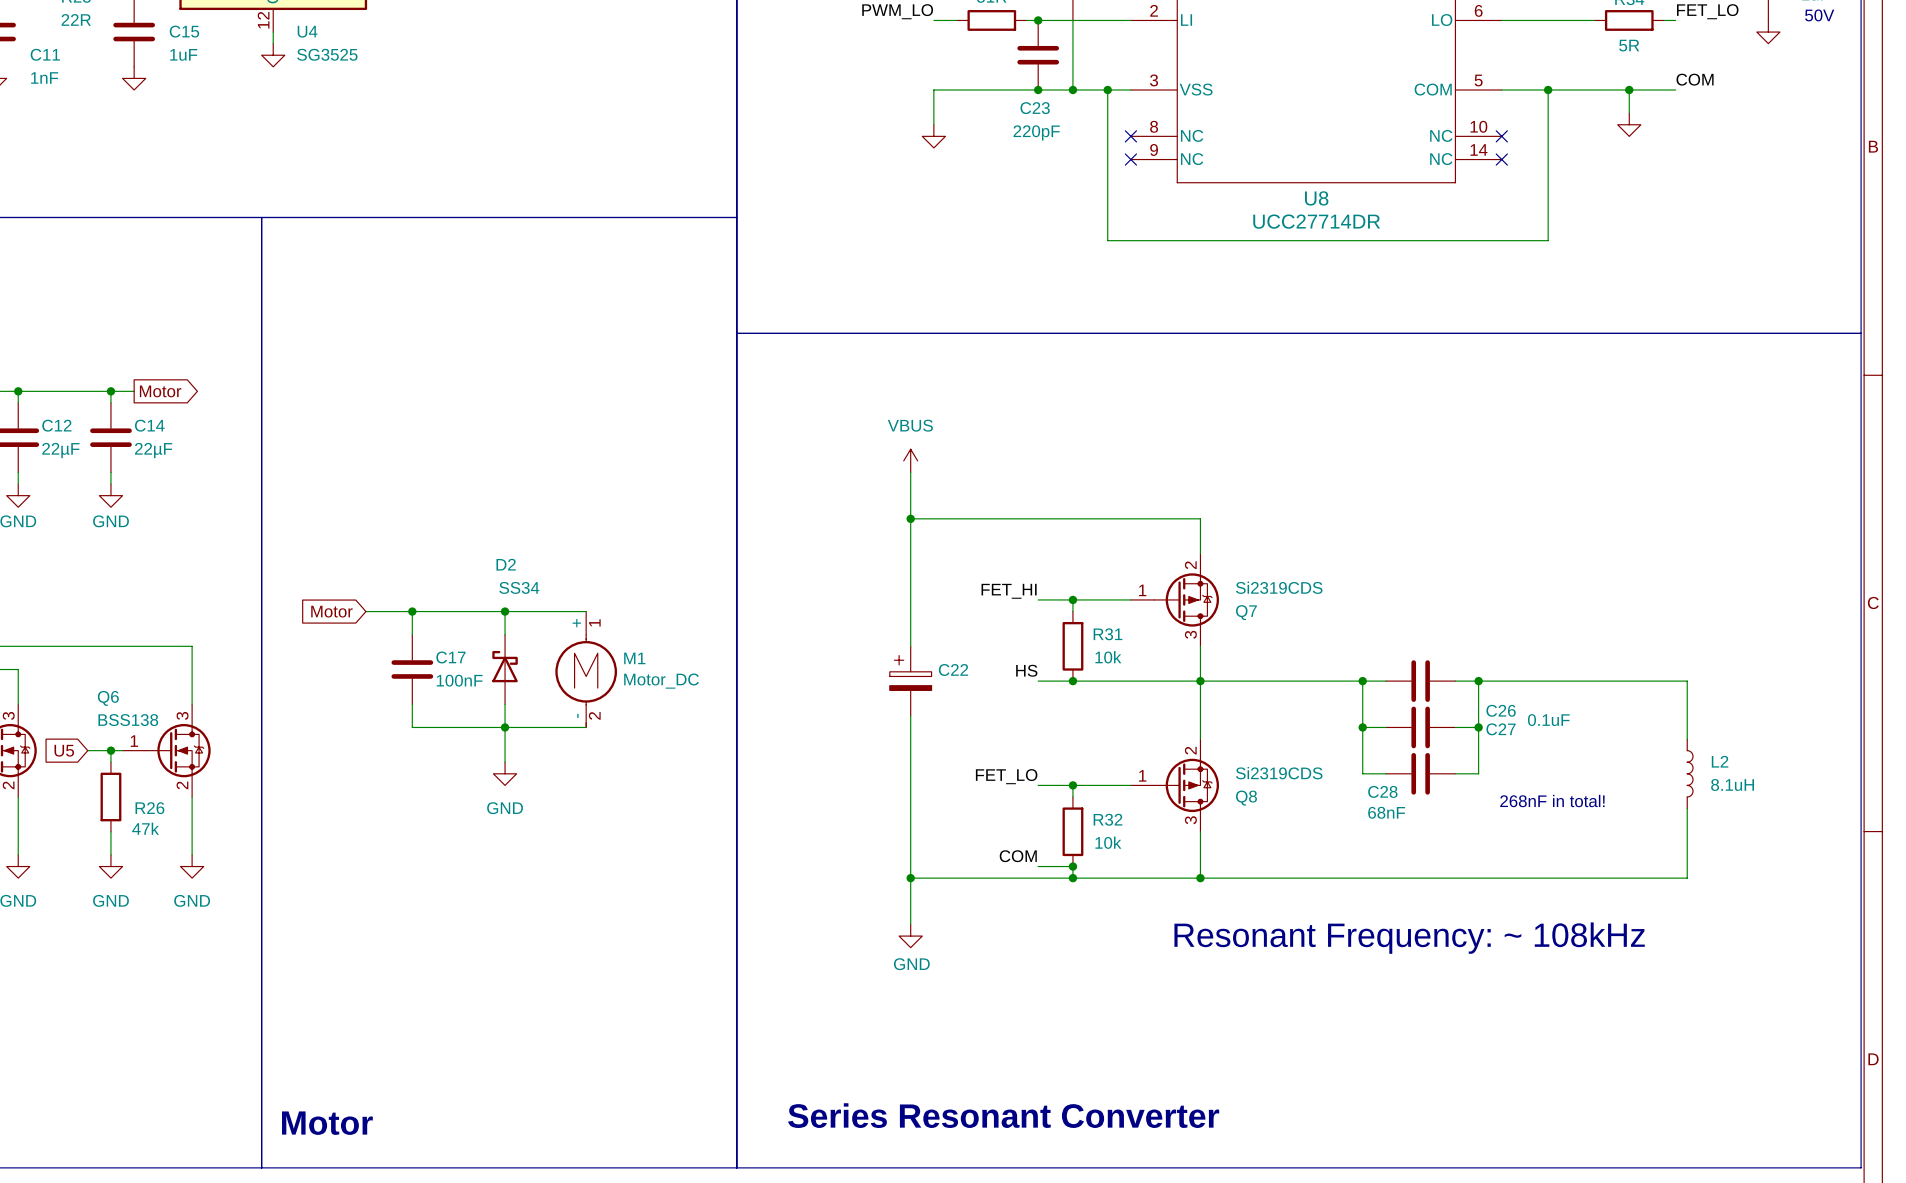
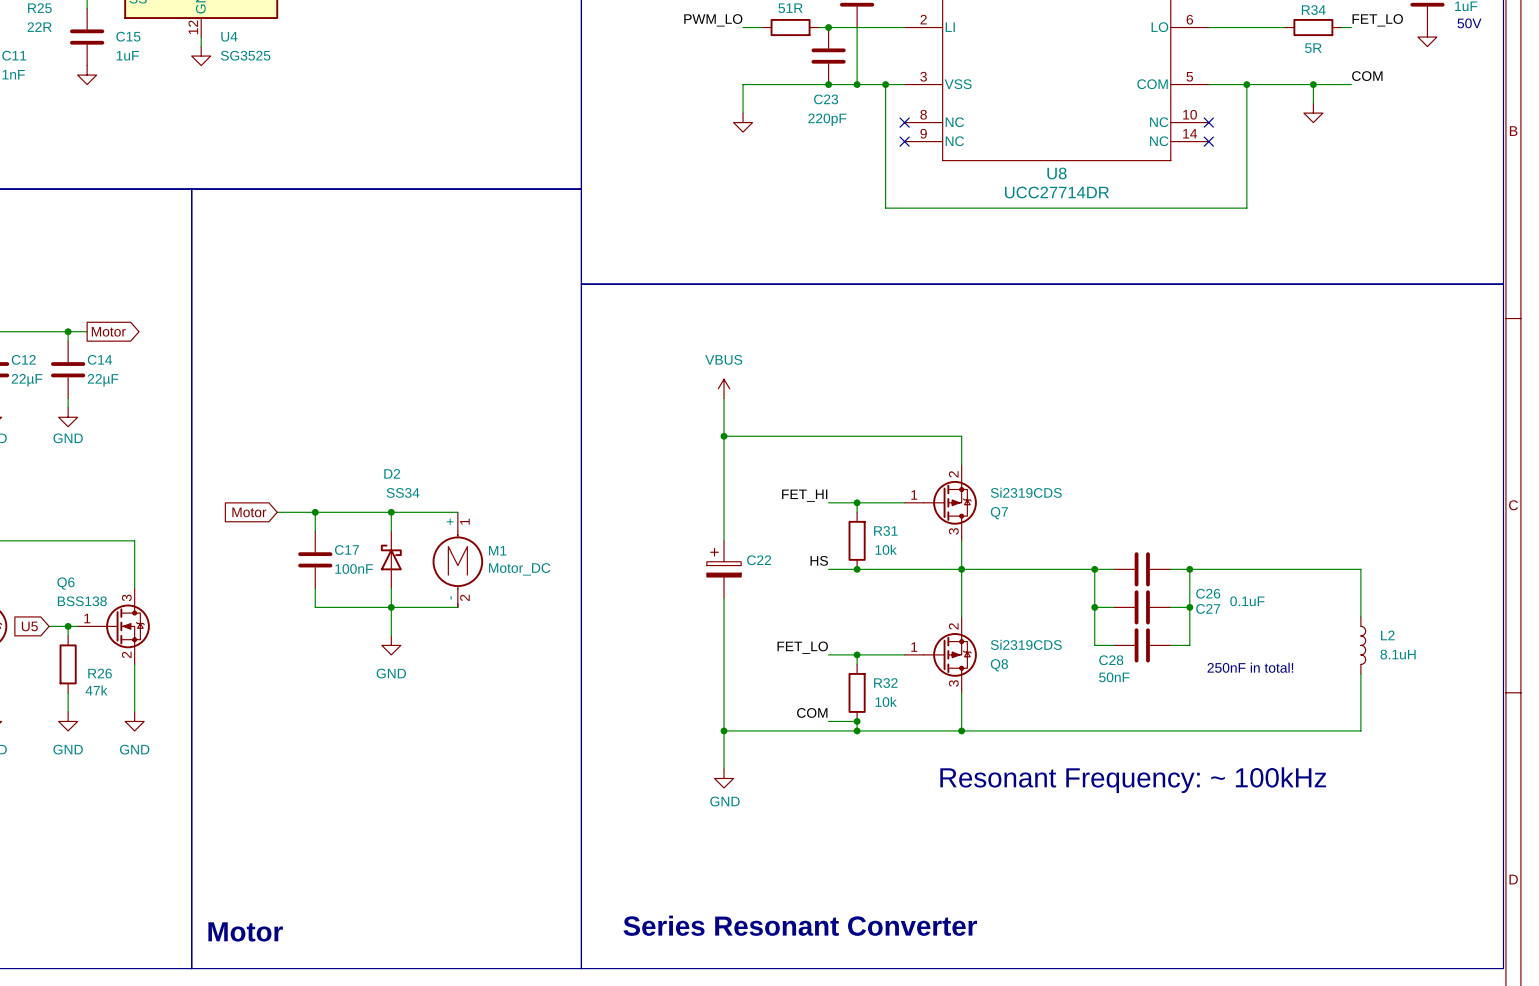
text: 268nF in total! (1552, 801) -> 250nF in total! (1250, 667)
C28 value: 68nF (1386, 812) -> 50nF (1114, 677)
text: Resonant Frequency: ~ 108kHz (1409, 938) -> Resonant Frequency: ~ 100kHz (1133, 780)

